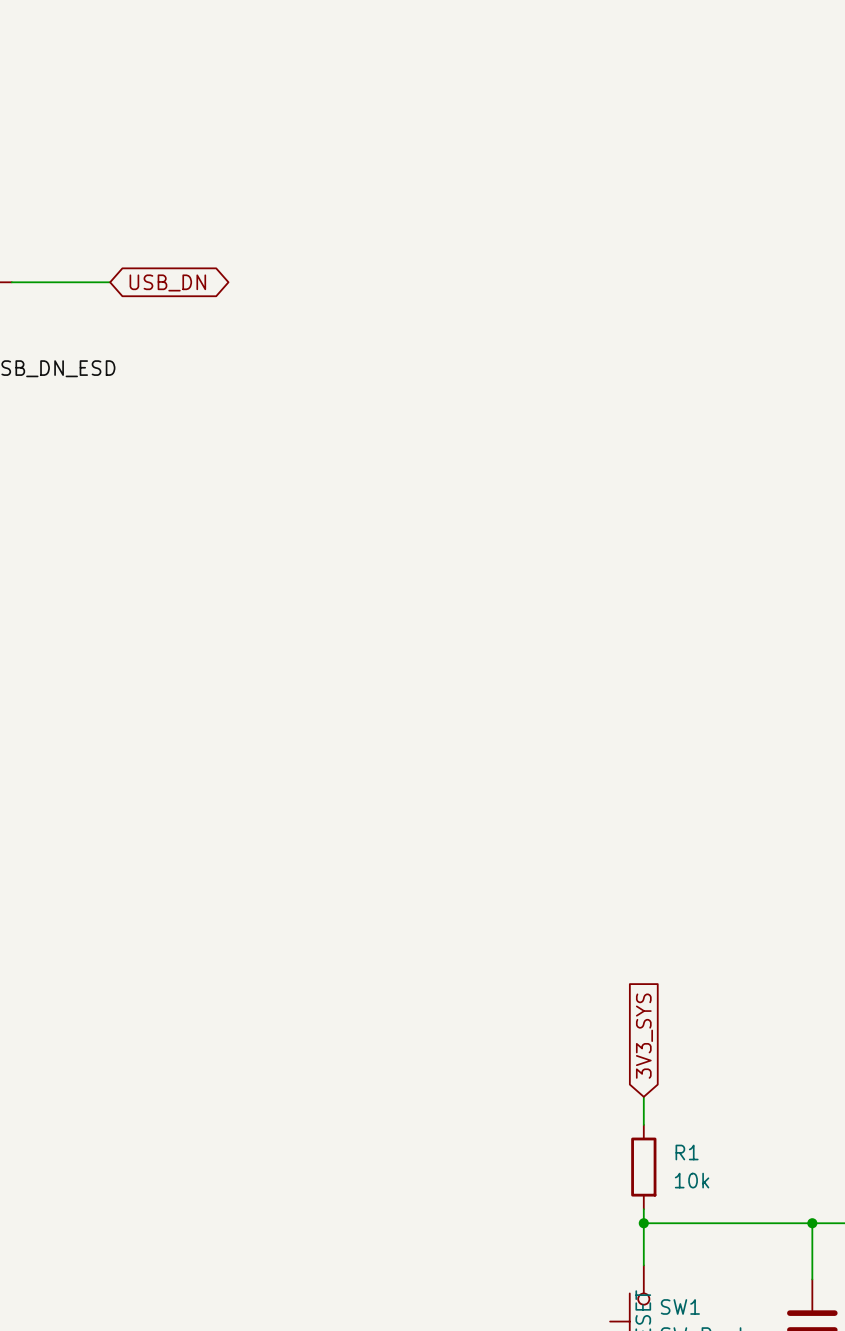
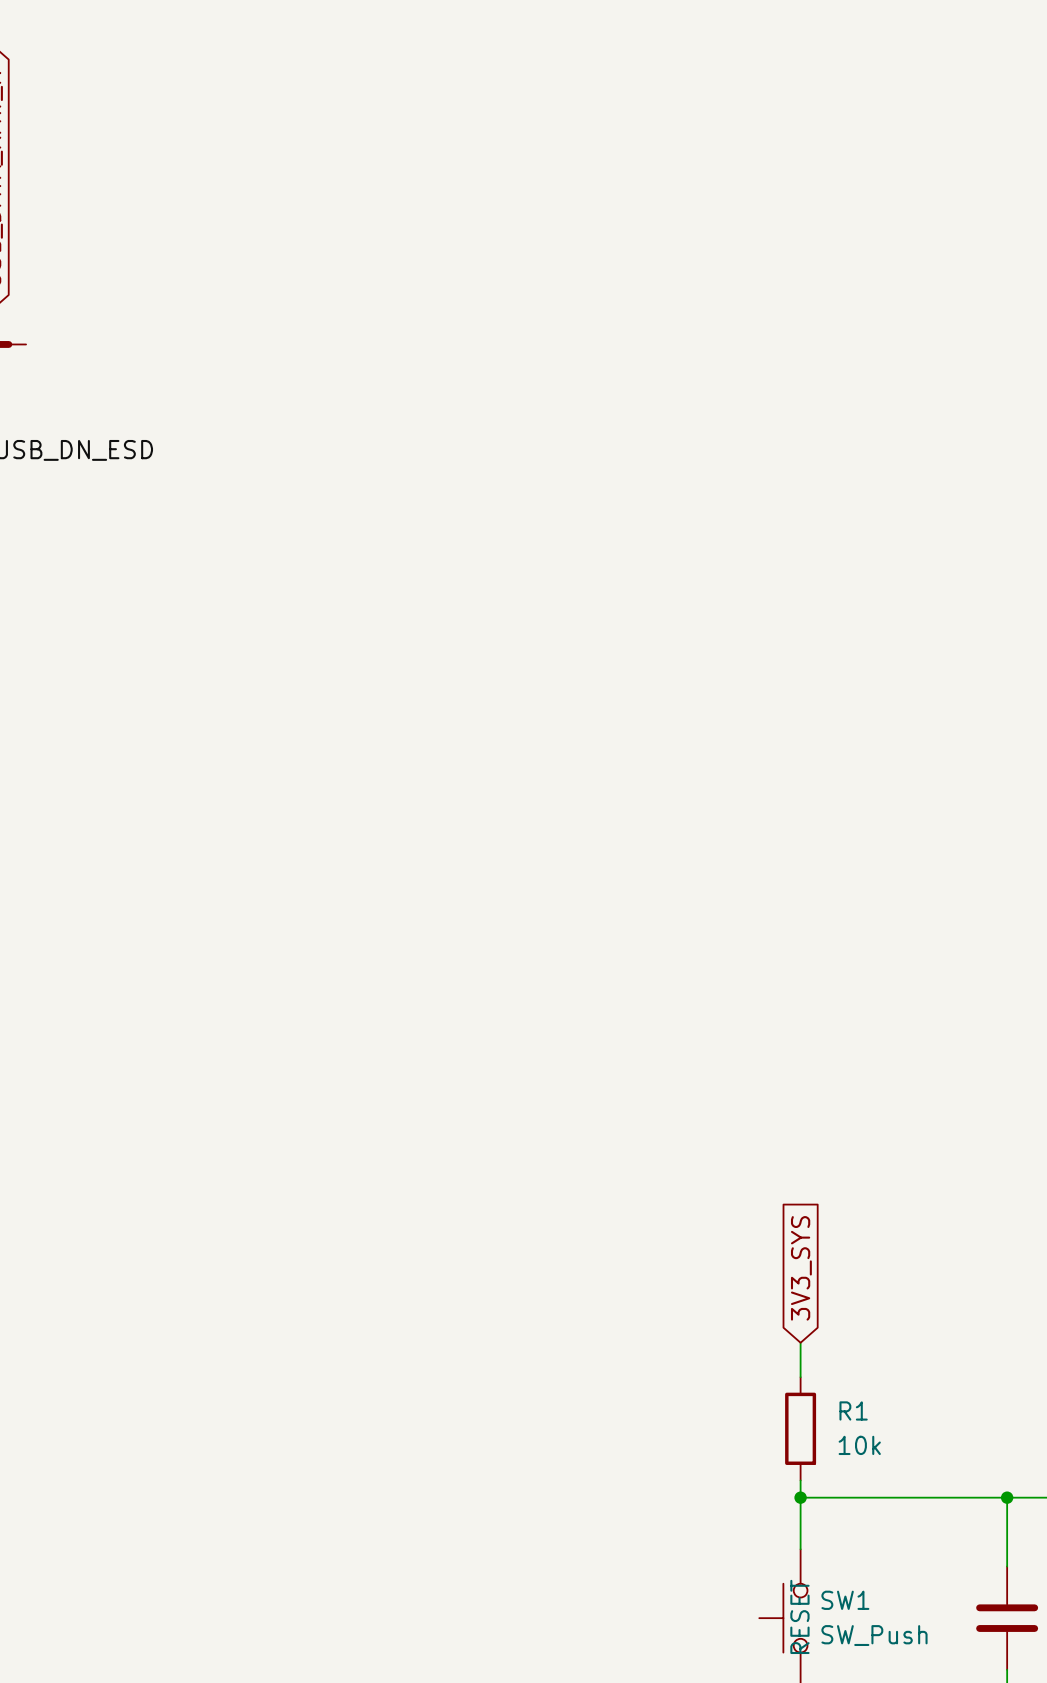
wire: (11, 282) (110, 282) -> none
global label: USB_DN (167, 282) -> none

